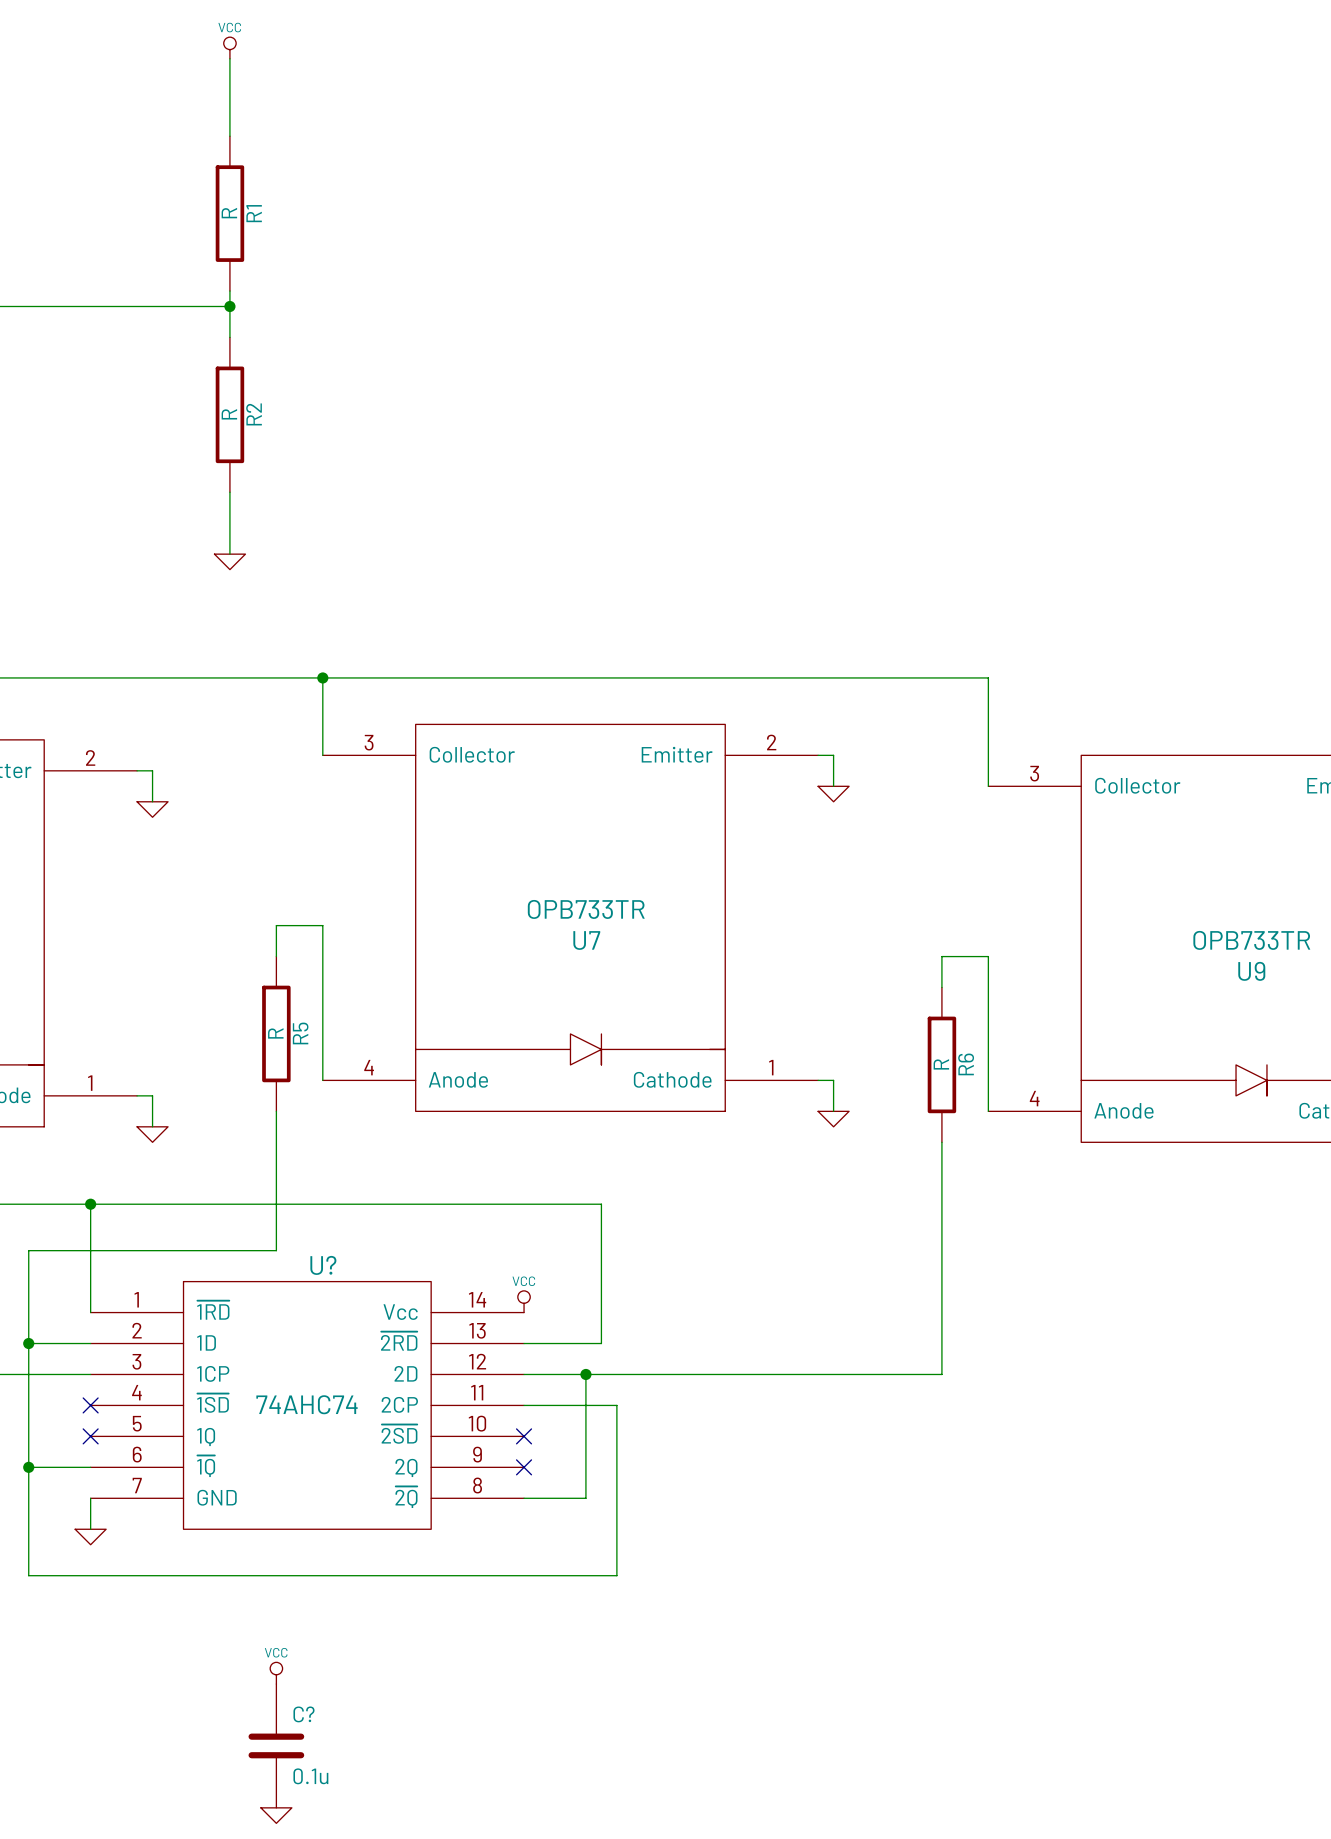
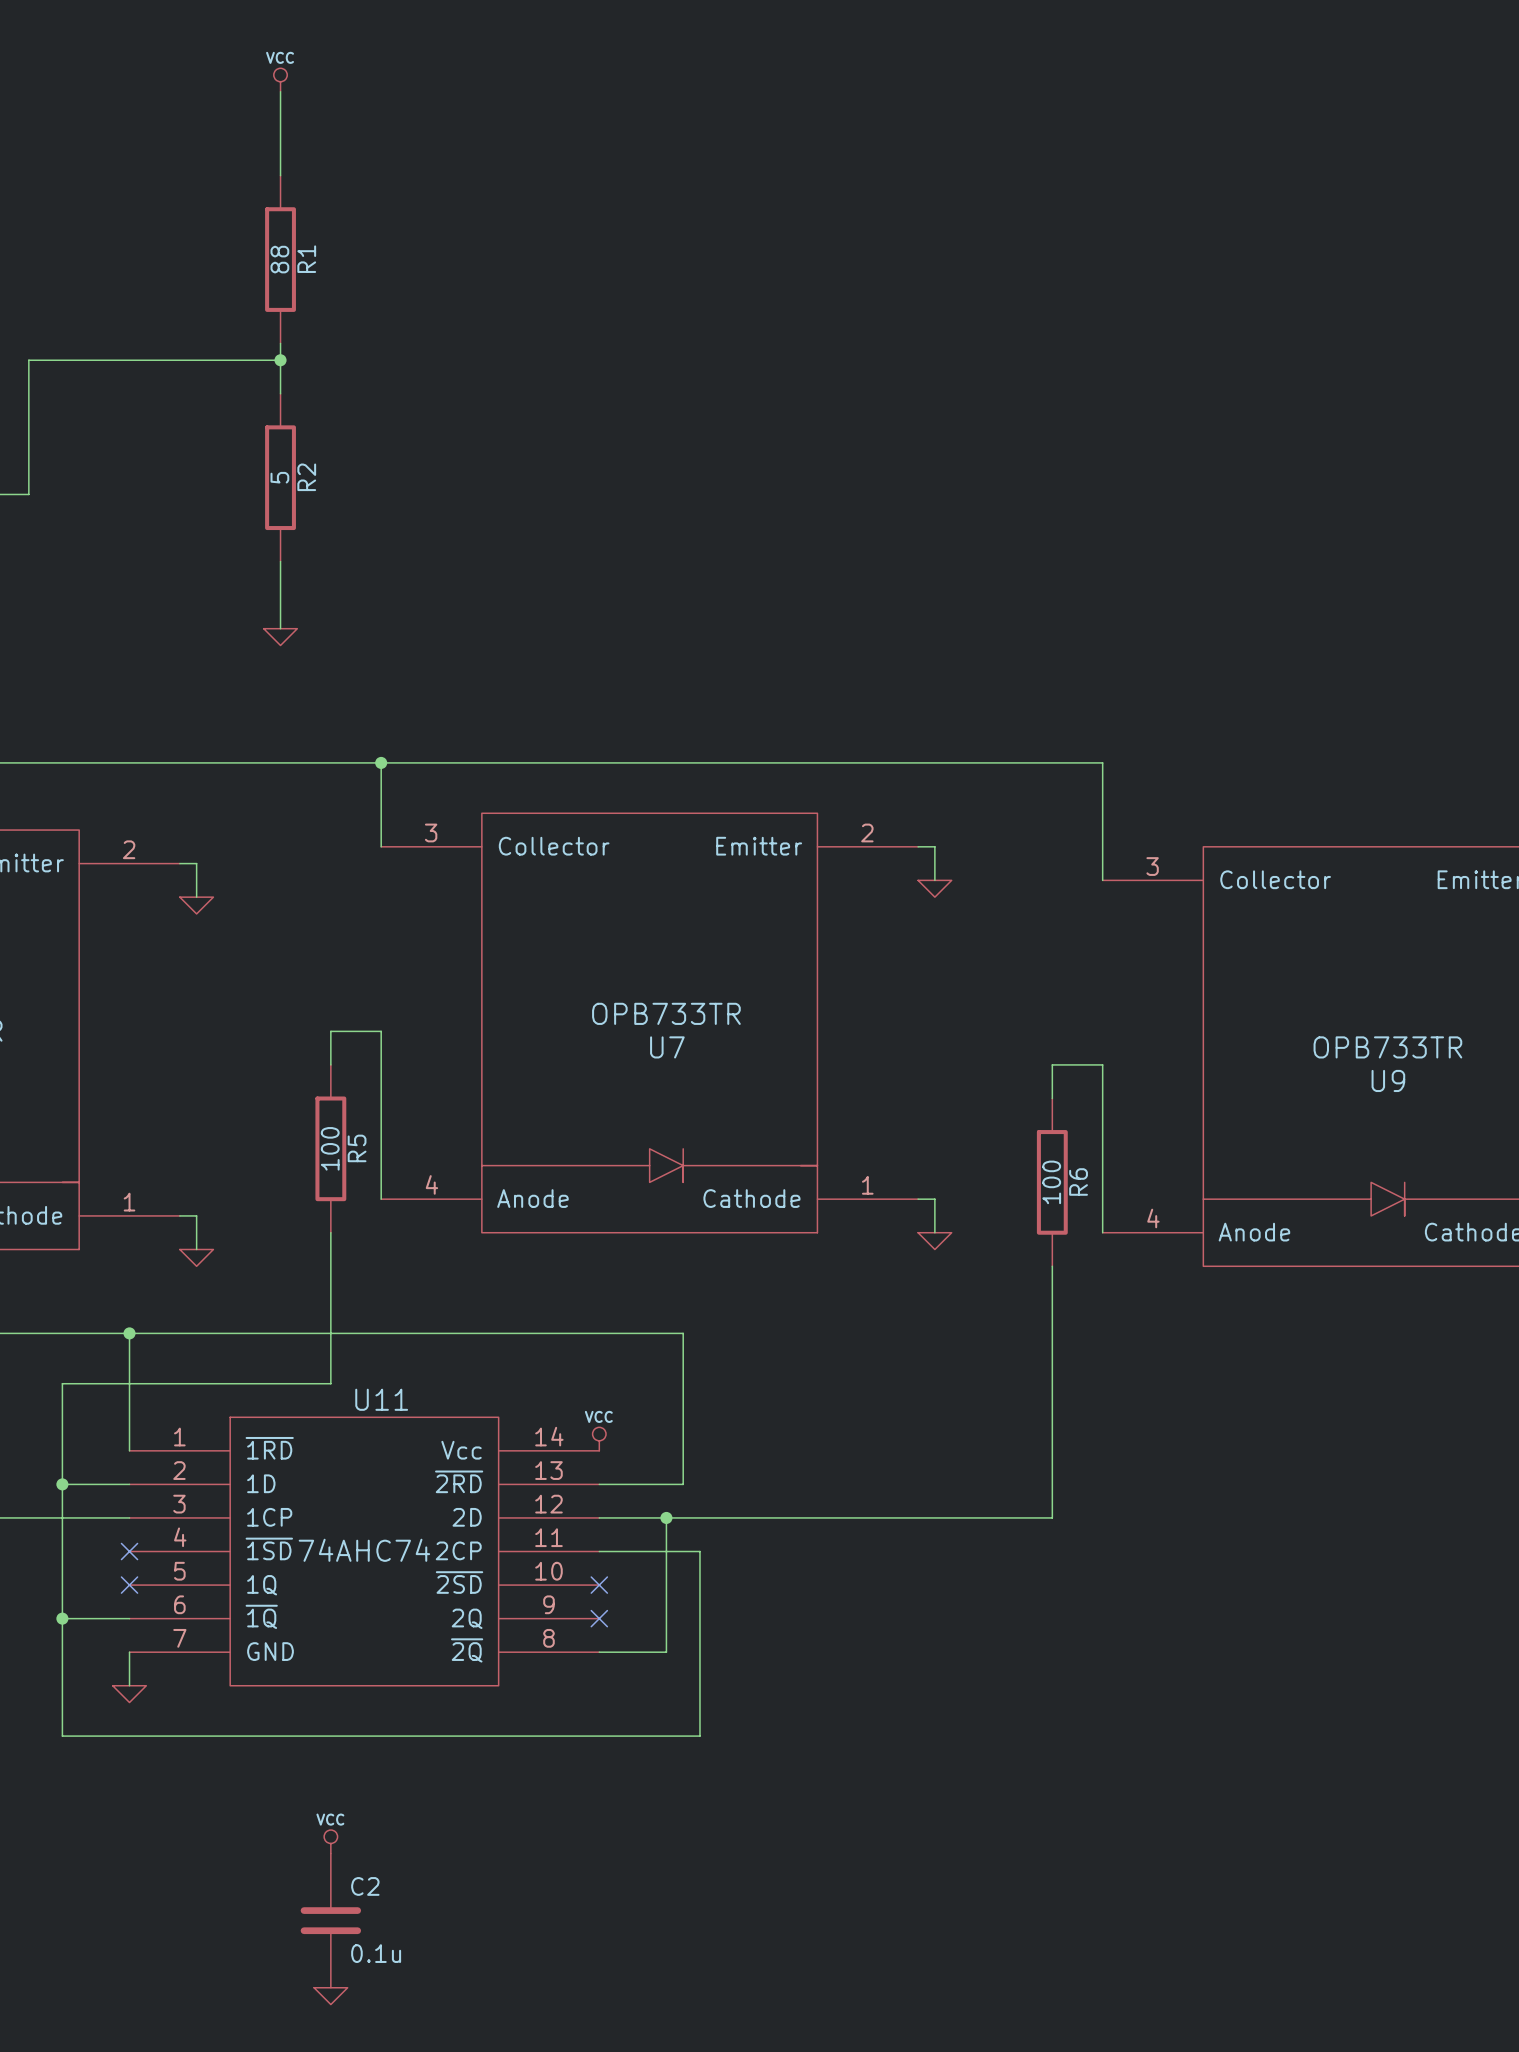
R1 value: R (229, 213) -> 88 (279, 259)
R2 value: R (229, 414) -> 5 (279, 477)
R5 value: R (275, 1033) -> 100 (330, 1148)
R6 value: R (941, 1064) -> 100 (1051, 1182)
U? name: U? (323, 1265) -> U11 (381, 1399)
C? name: C? (303, 1714) -> C2 (365, 1886)

